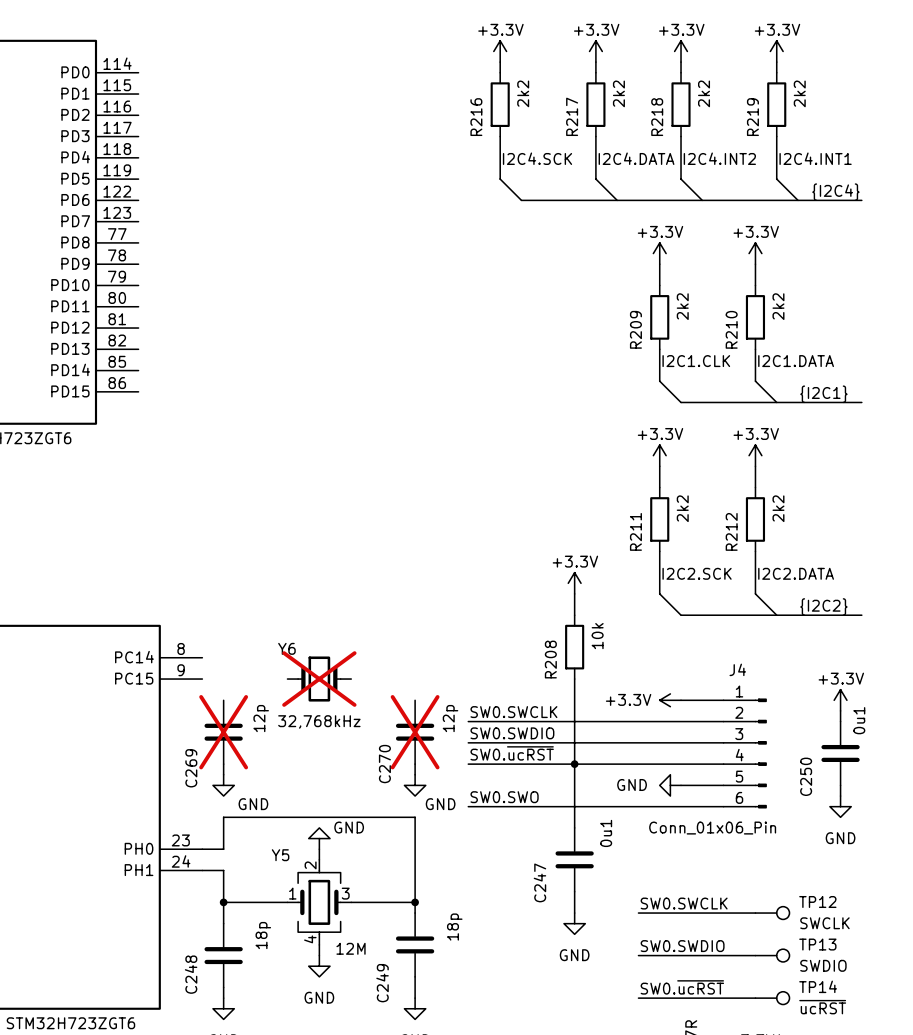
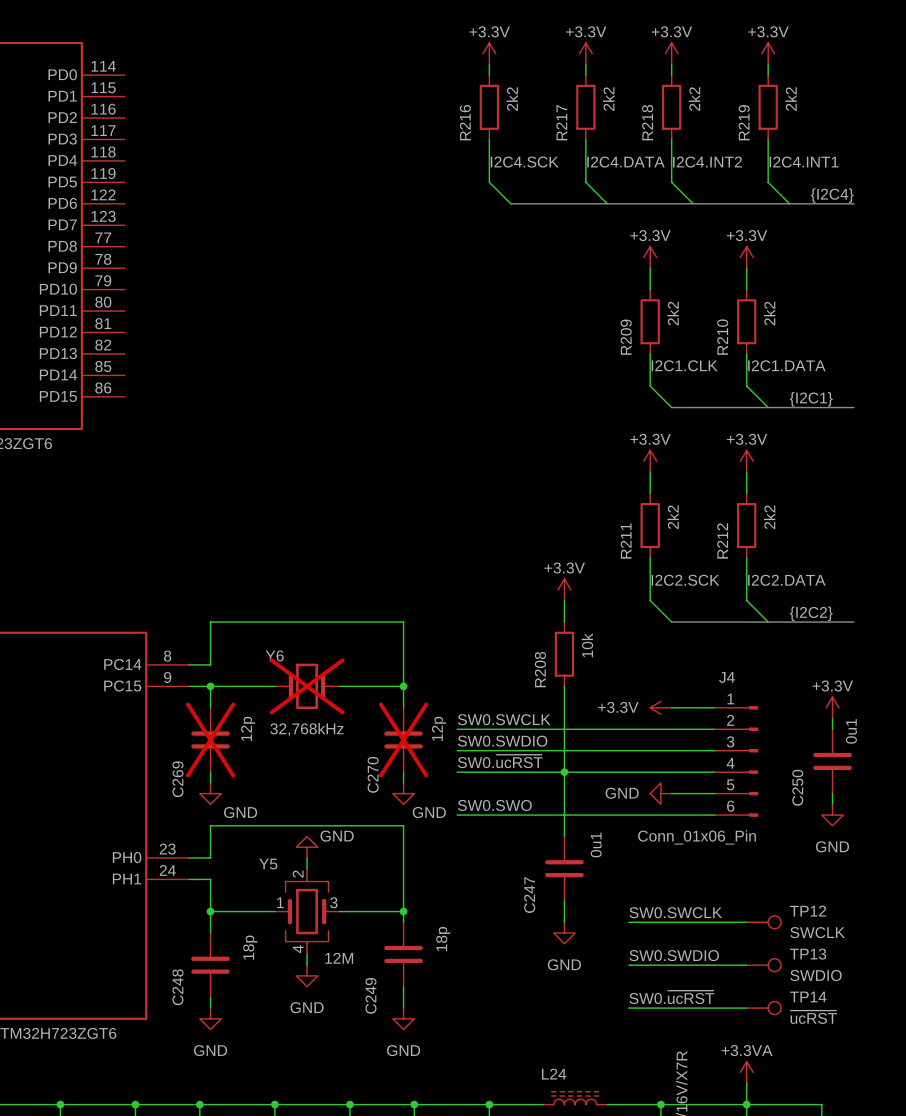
wire: none -> (189, 664) (210, 664) (210, 622) (403, 622) (403, 707)
wire: none -> (189, 686) (274, 686)
wire: none -> (210, 686) (210, 707)
junction: none -> (210, 686)
wire: none -> (339, 686) (403, 686)
junction: none -> (403, 686)

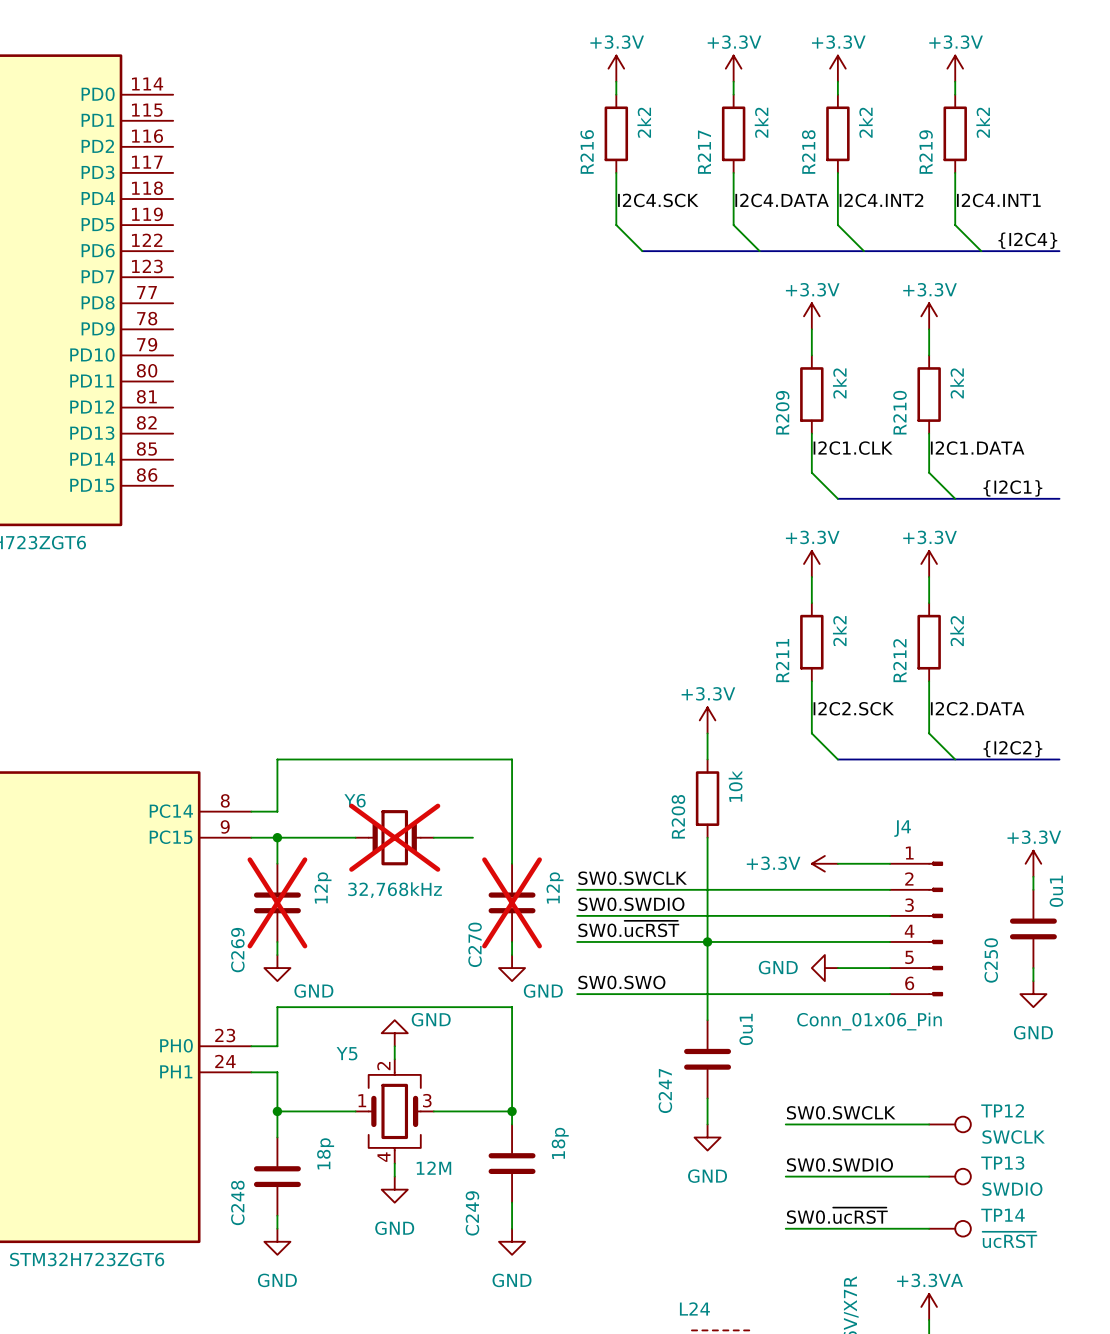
wire: (371, 686) (403, 686) -> none
junction: (403, 686) -> none

